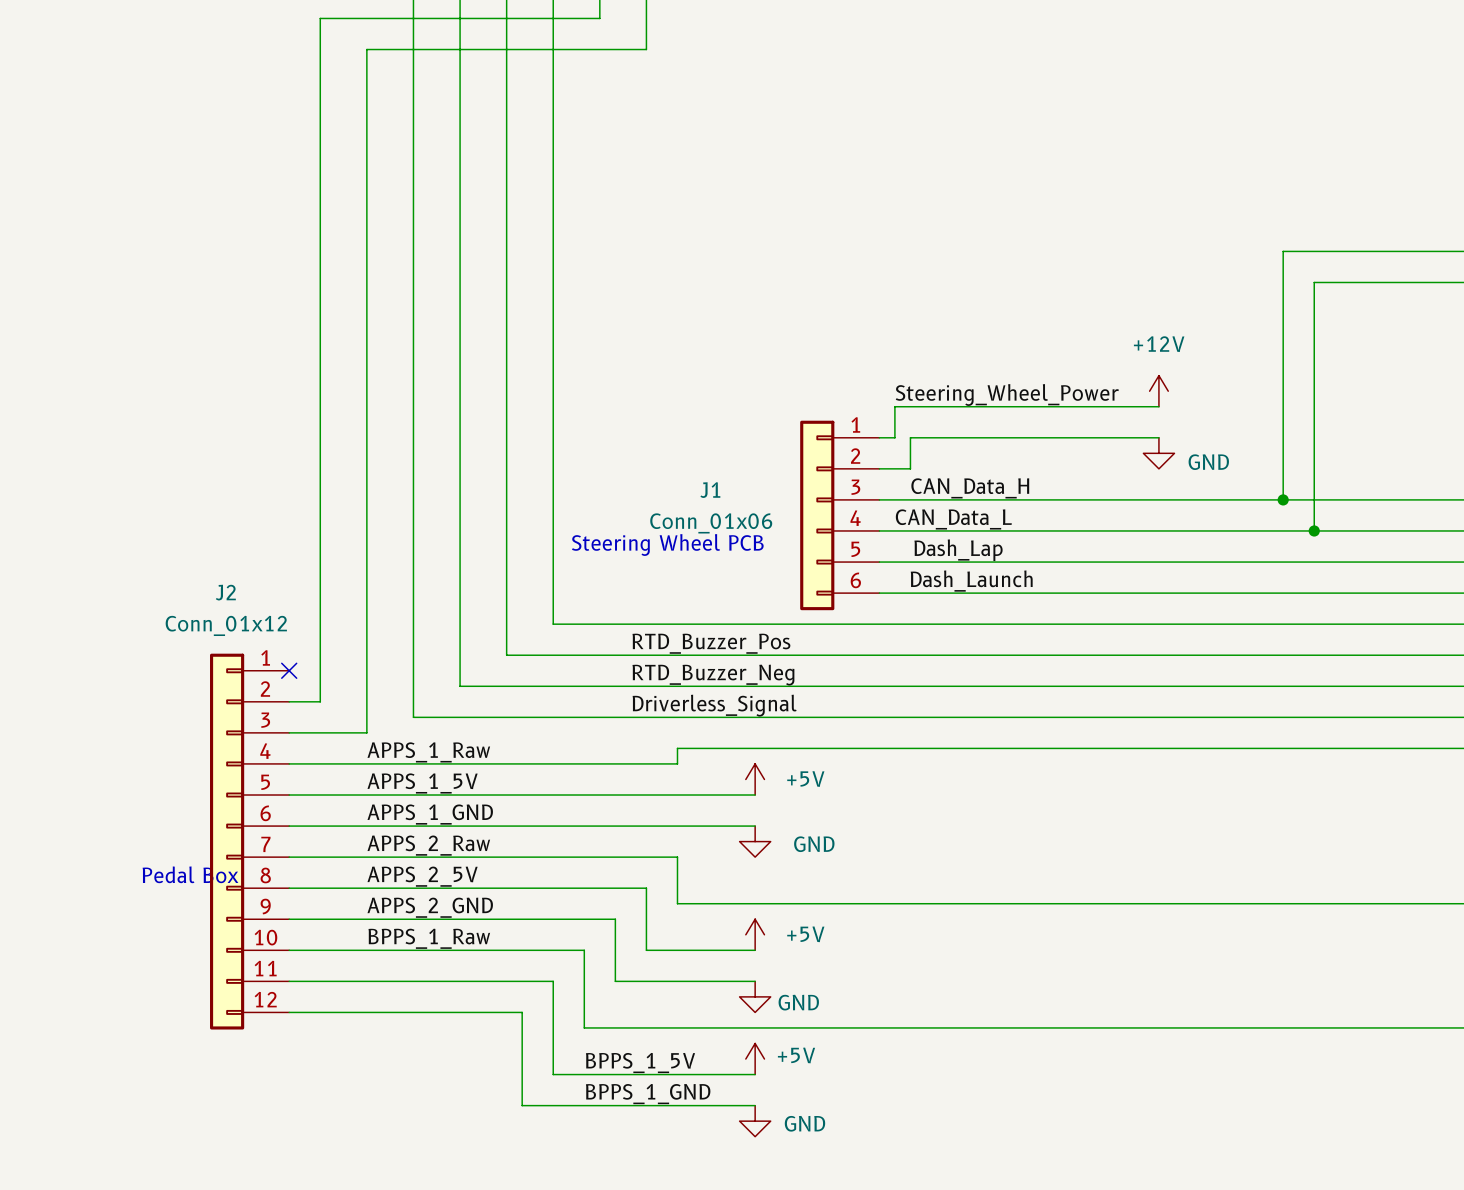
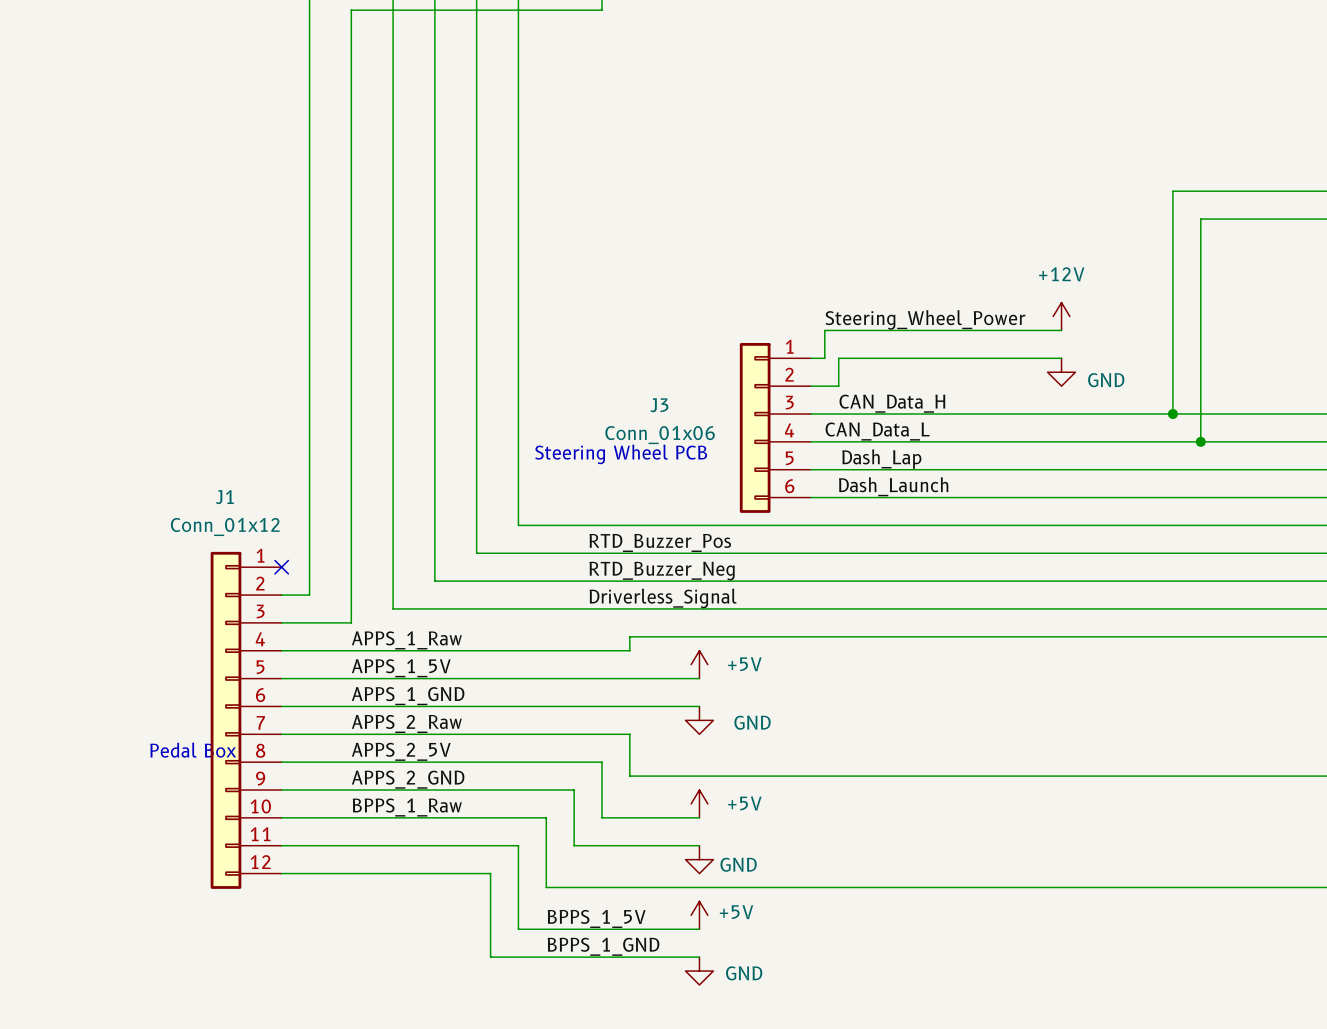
J1 name: J1 (710, 490) -> J3 (659, 405)
J2 name: J2 (225, 592) -> J1 (224, 497)

